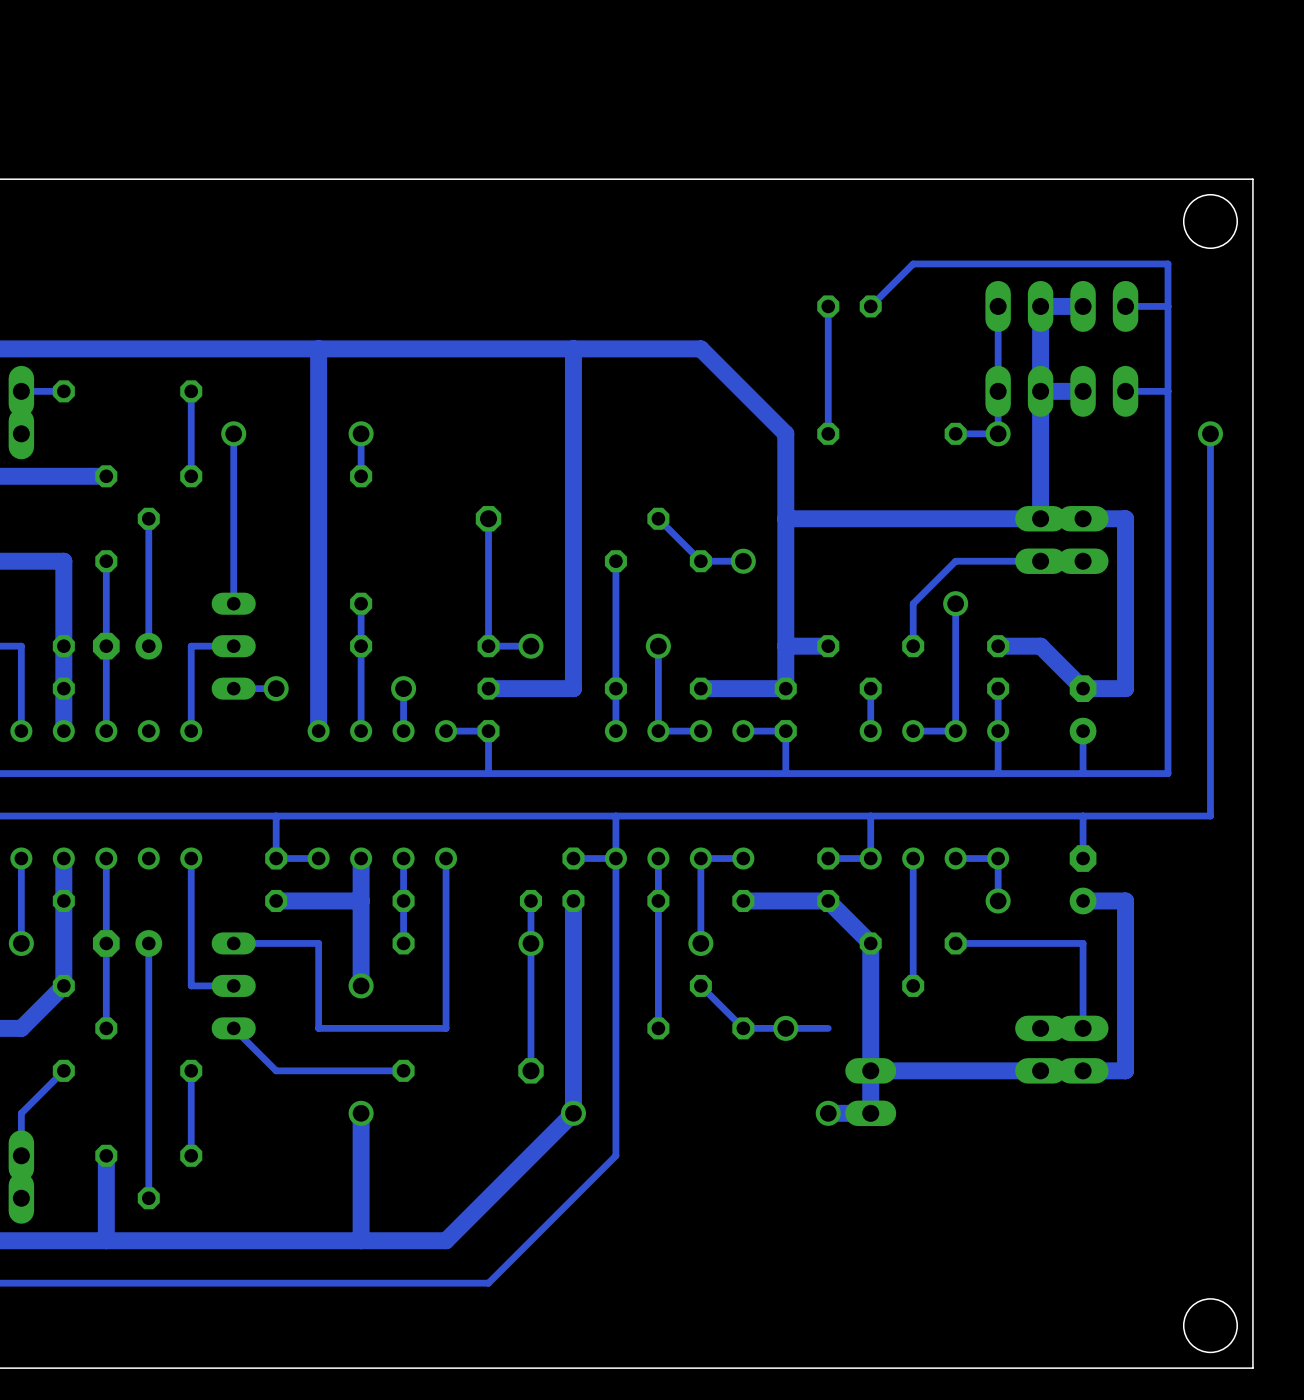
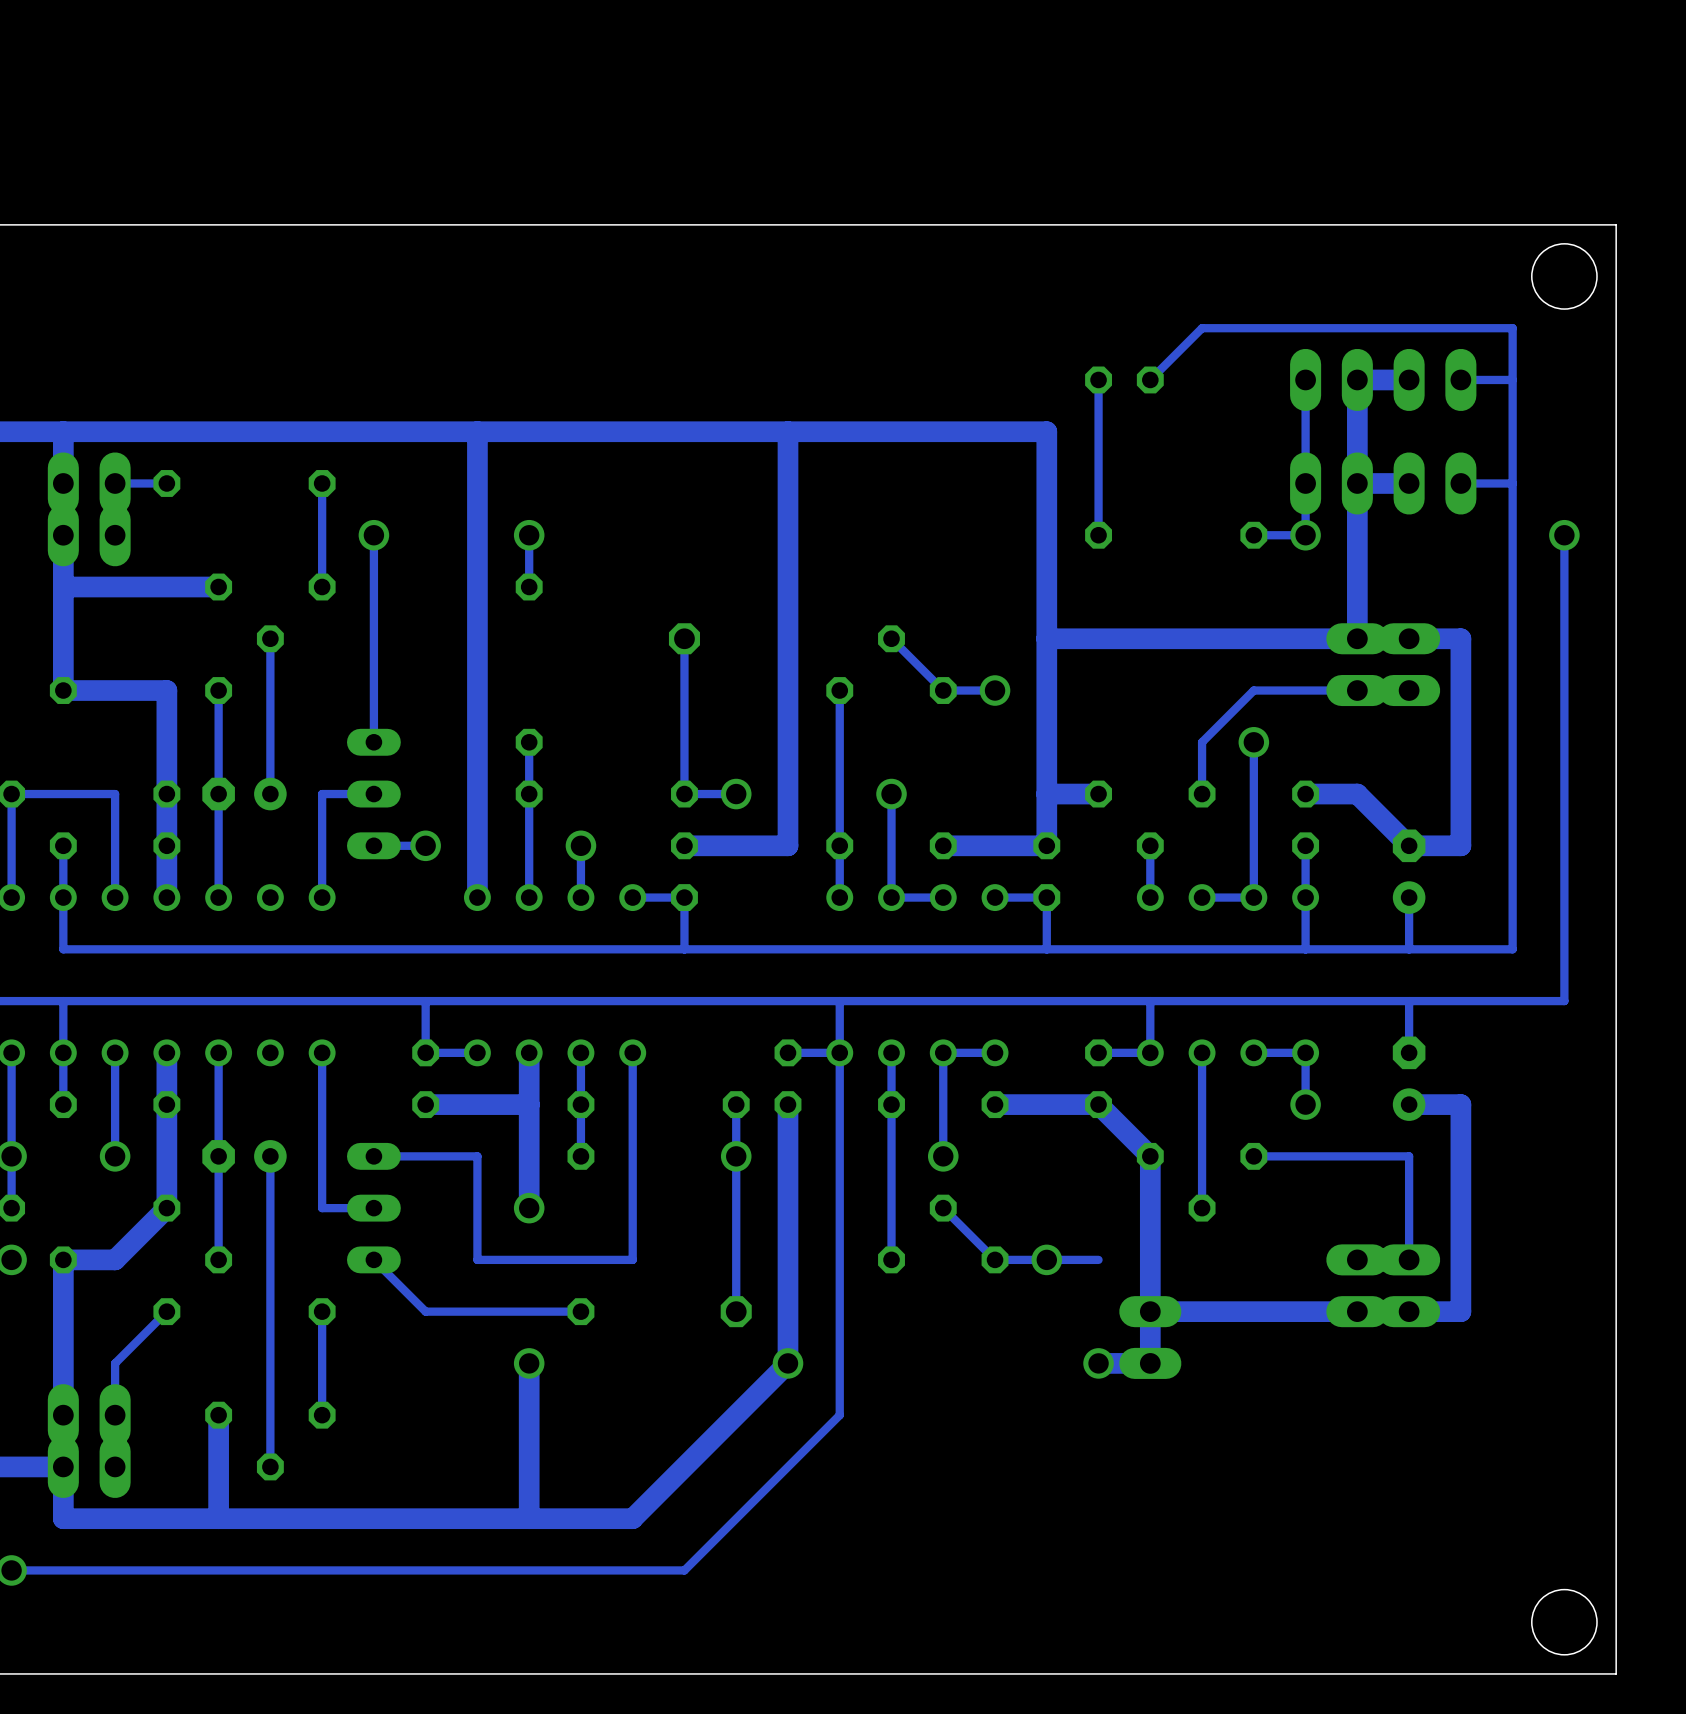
track: (700, 348) (785, 433) -> (943, 431) (1046, 431) (1046, 535)

